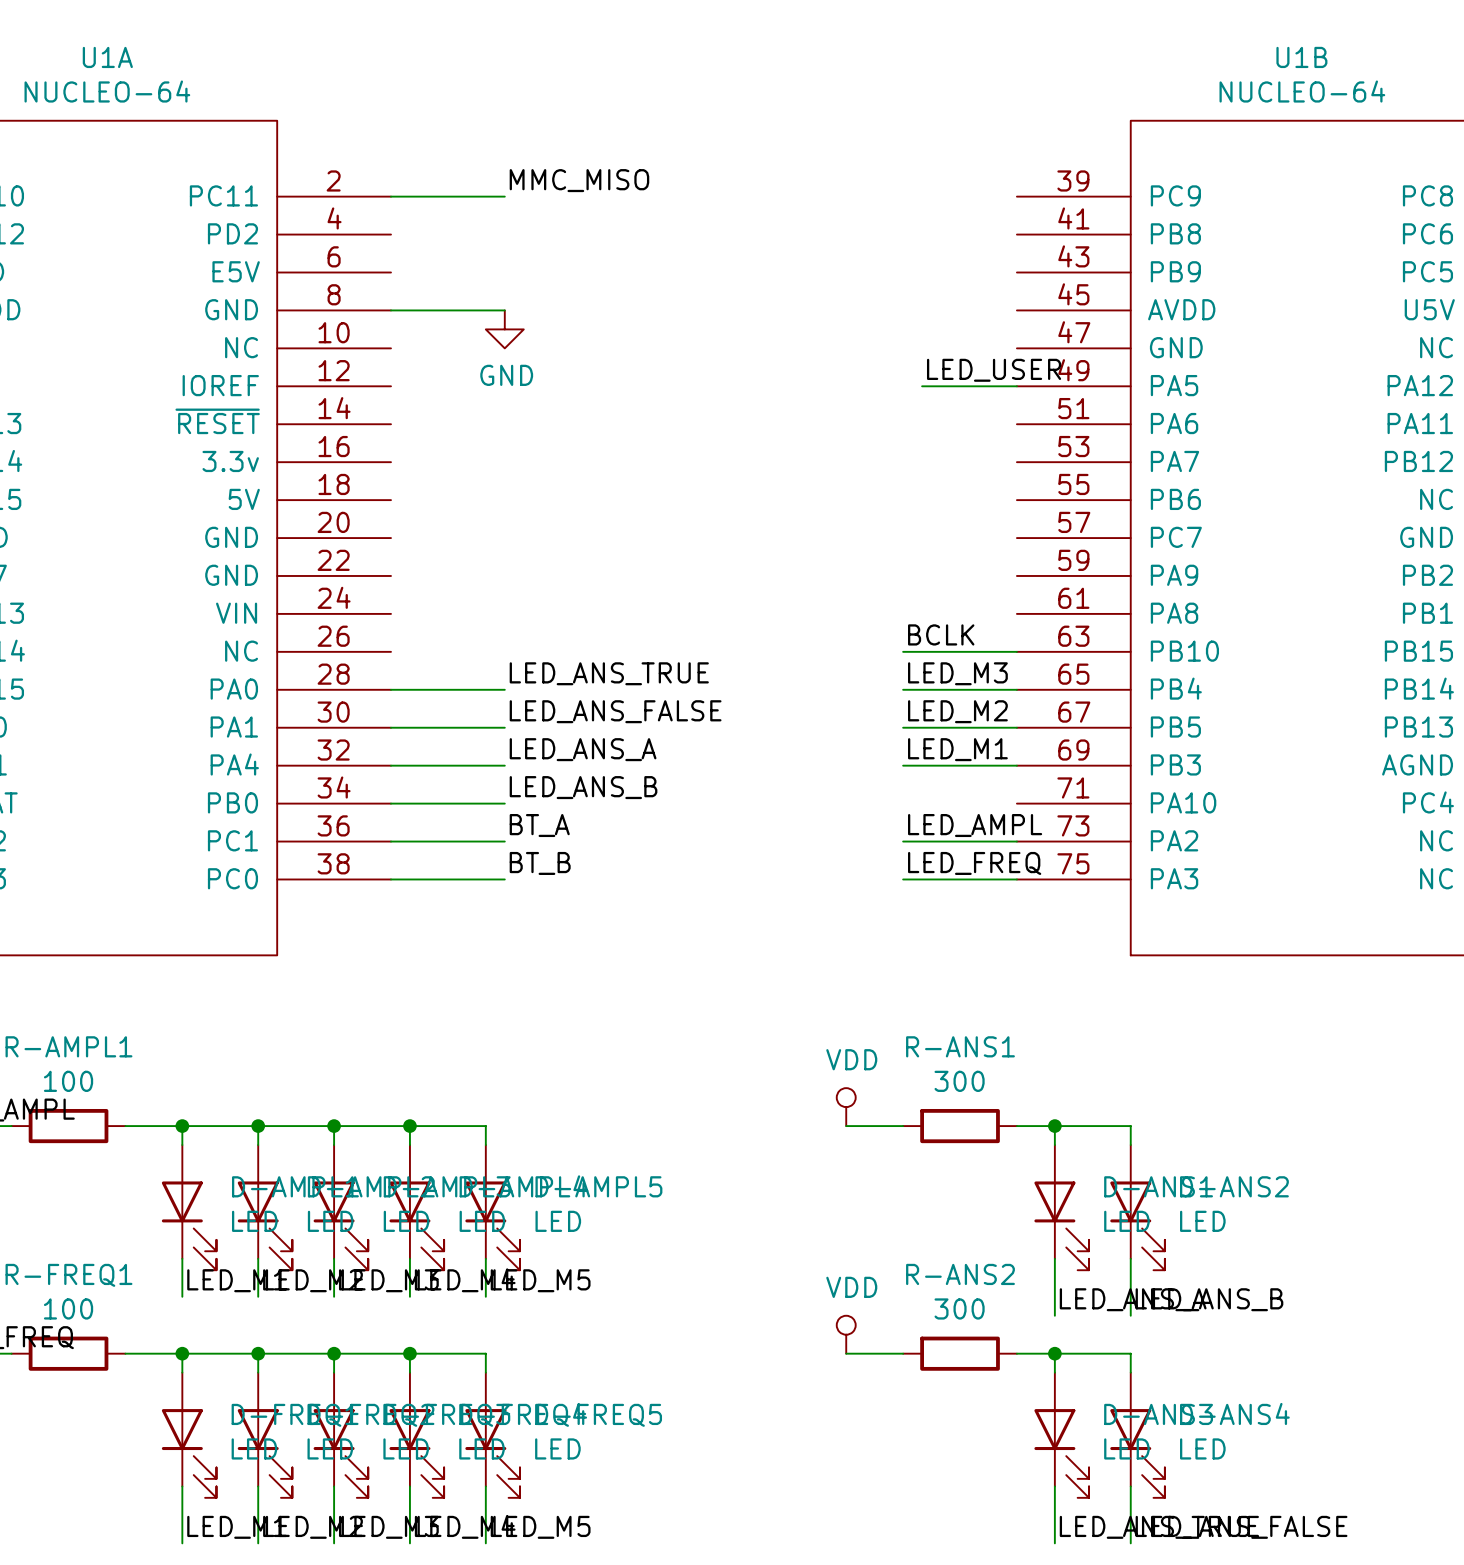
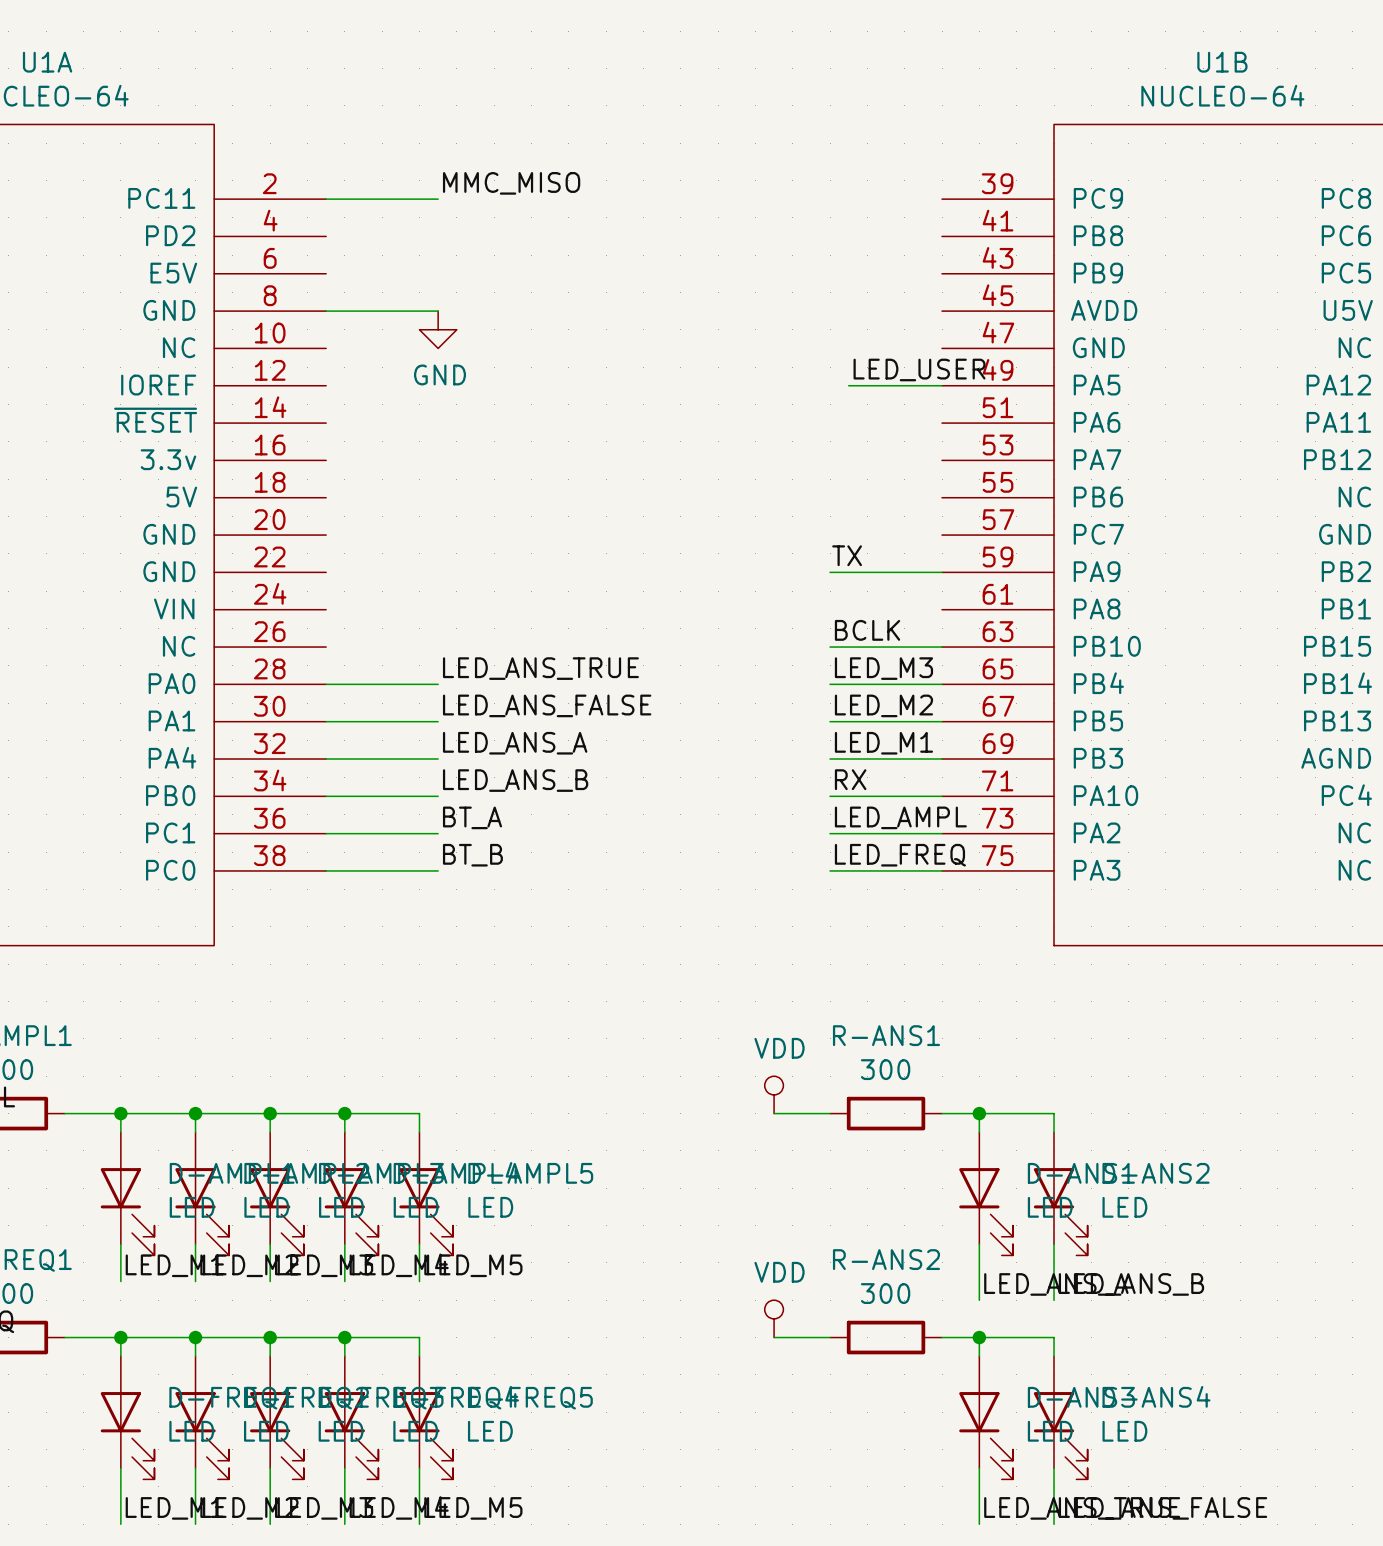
label: none -> TX (847, 555)
wire: none -> (830, 572) (942, 572)
label: none -> RX (850, 779)
wire: none -> (830, 796) (942, 796)

